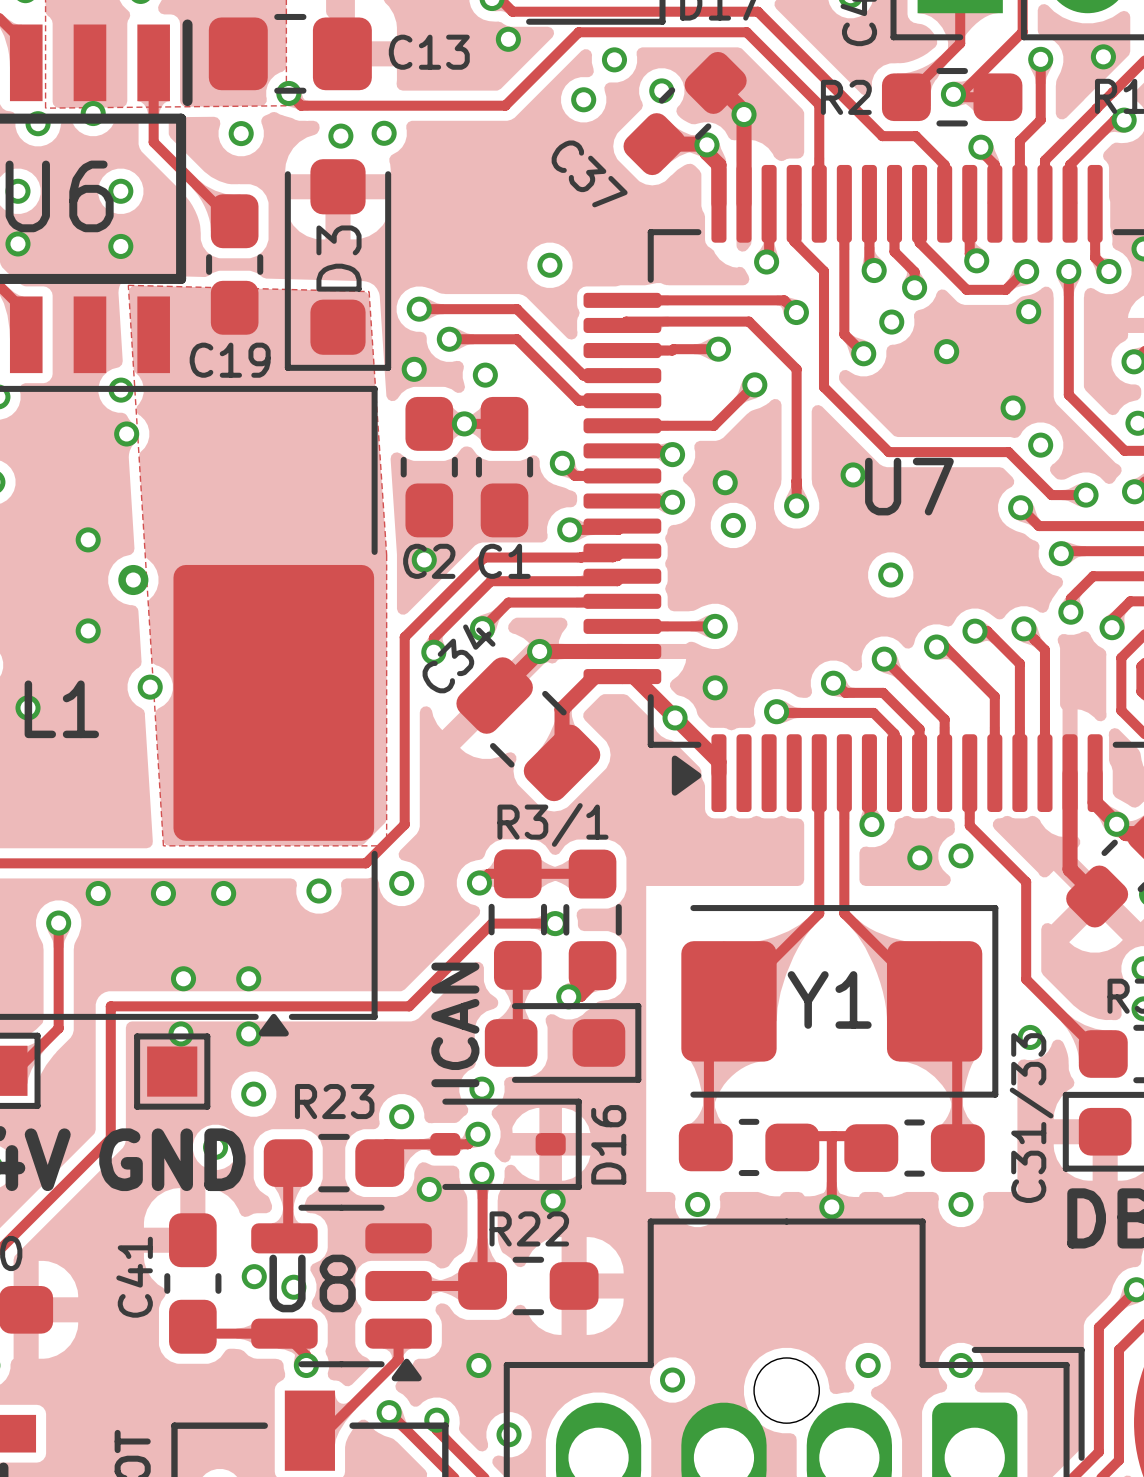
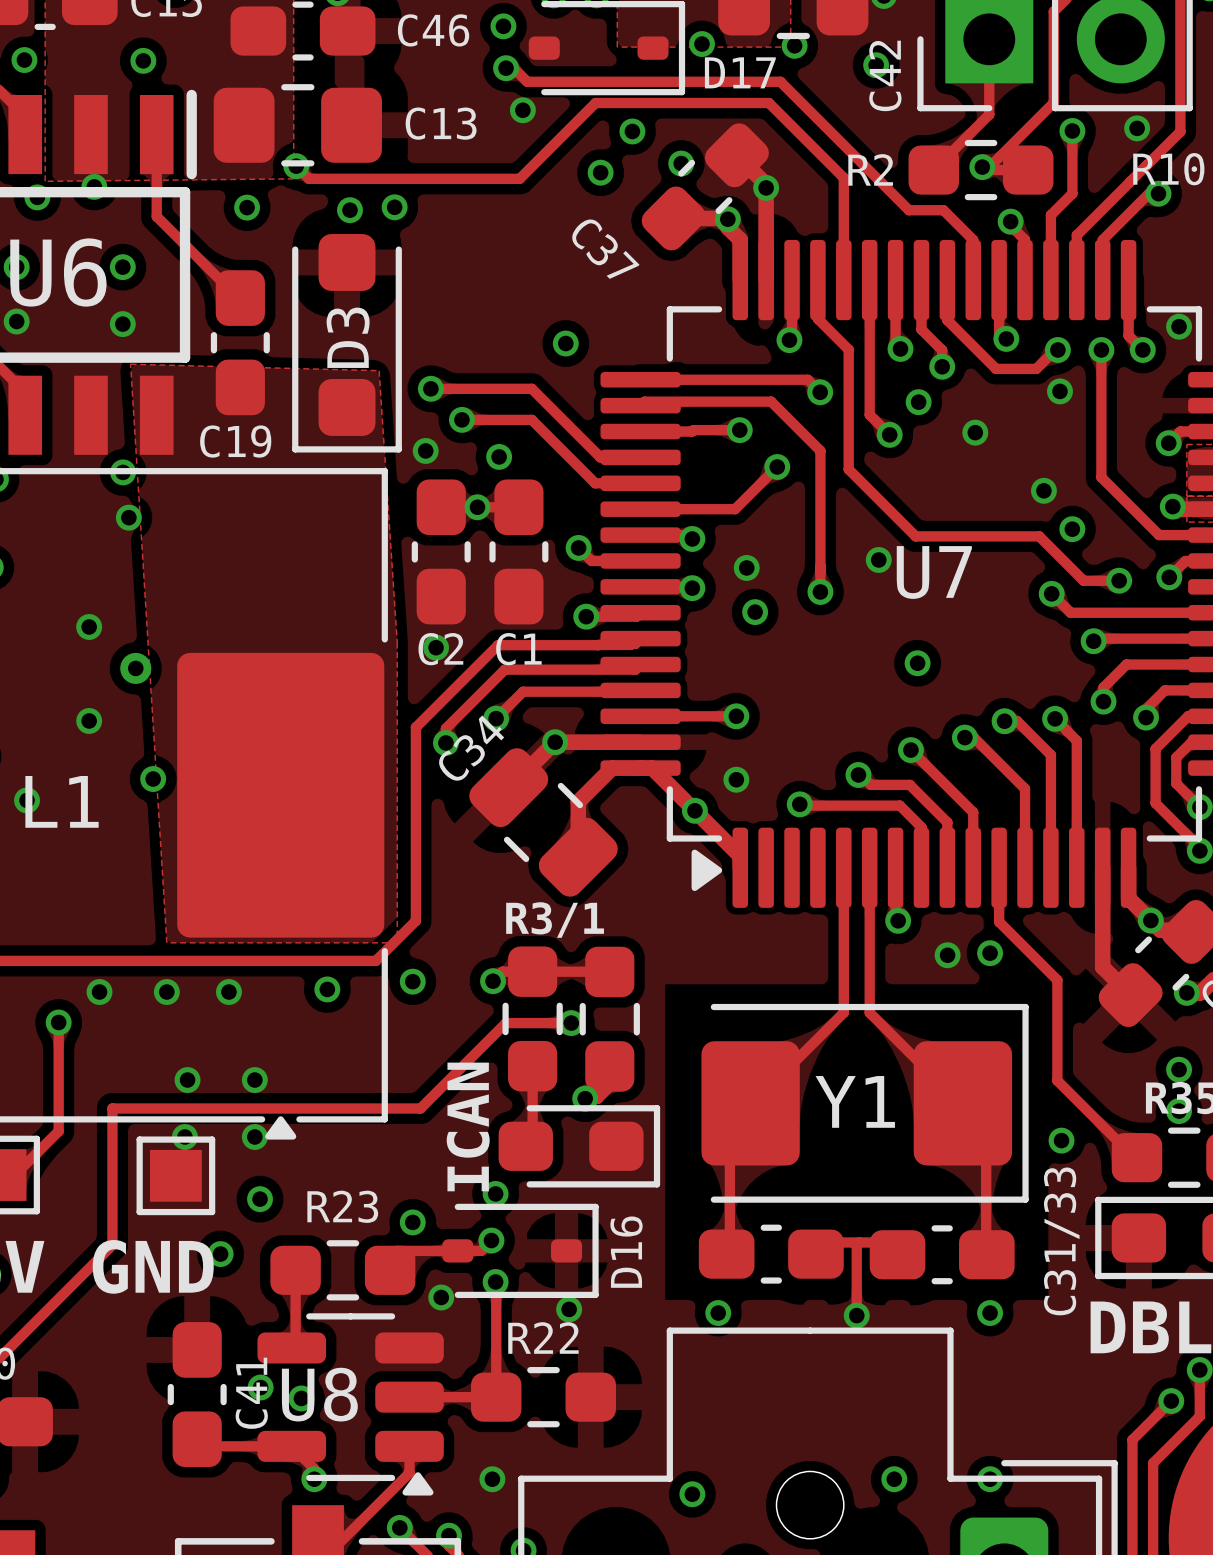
C41 name position: C41 (134, 1277) -> C41 (251, 1393)

